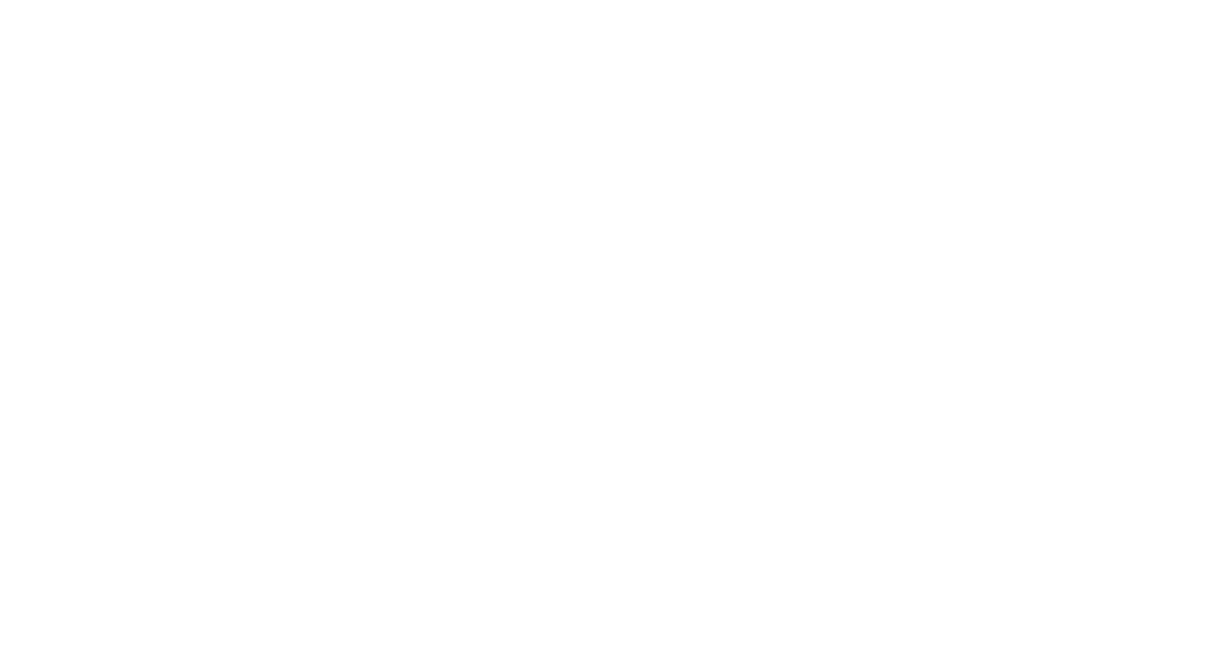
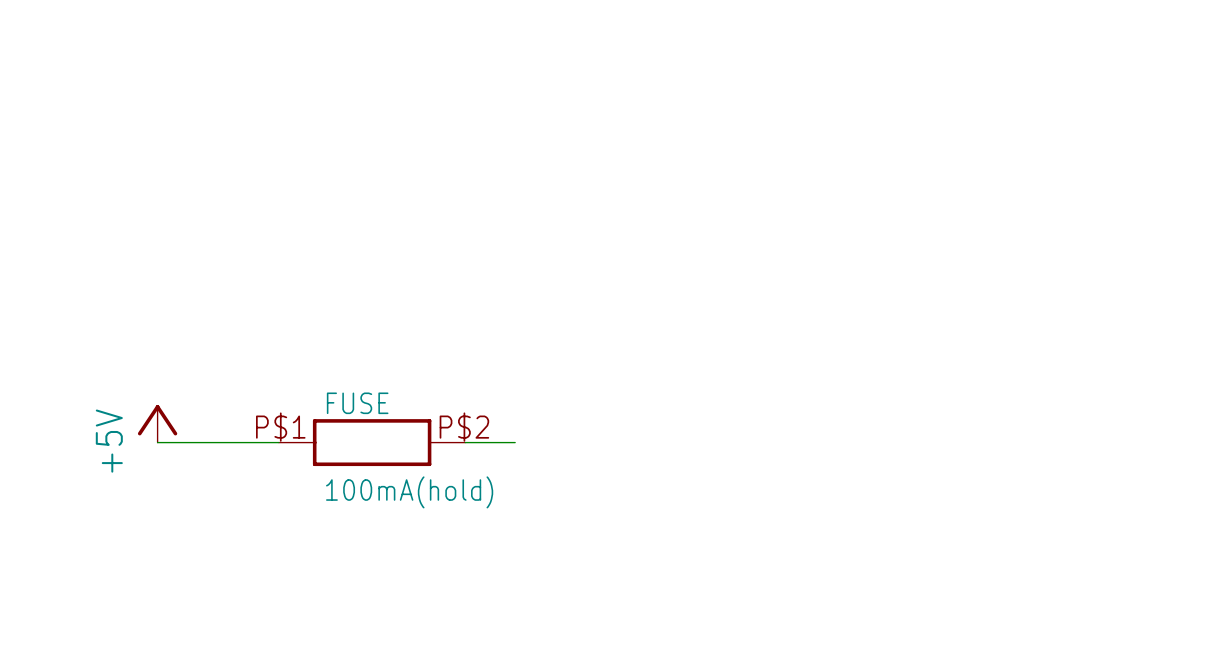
power symbol: none -> +5V (157, 423)
wire: none -> (157, 442) (278, 442)
FUSE: none -> 100mA(hold) (372, 442)
wire: none -> (465, 442) (515, 442)

